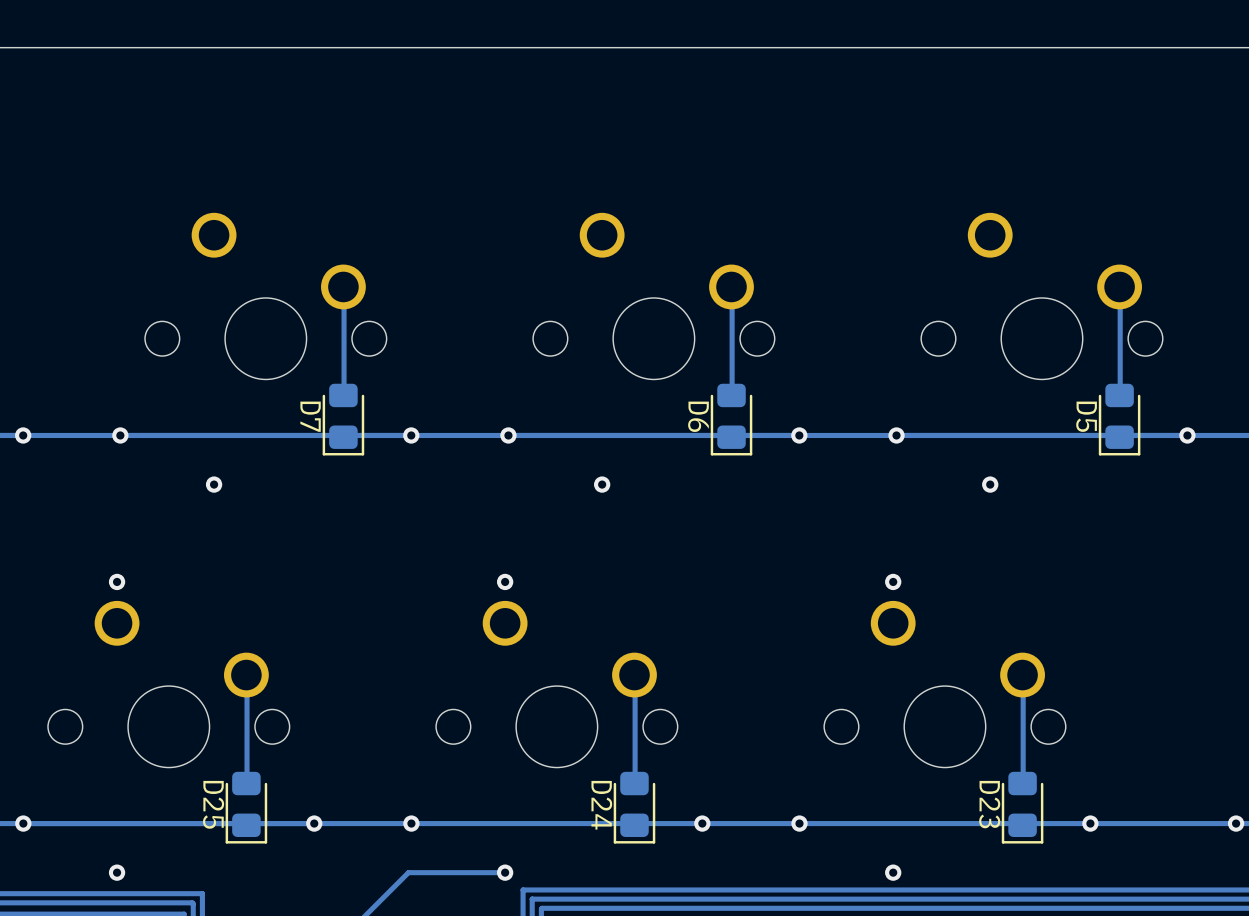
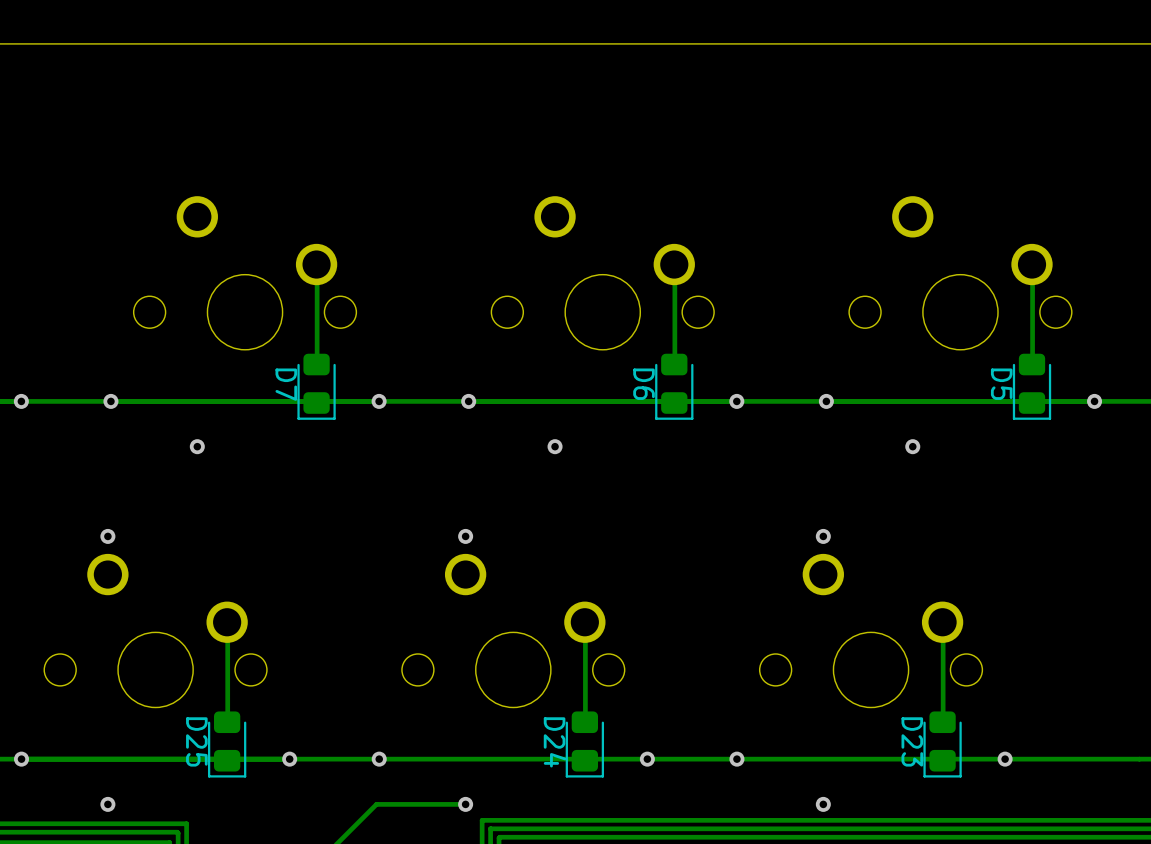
via: (1236, 823) -> none

